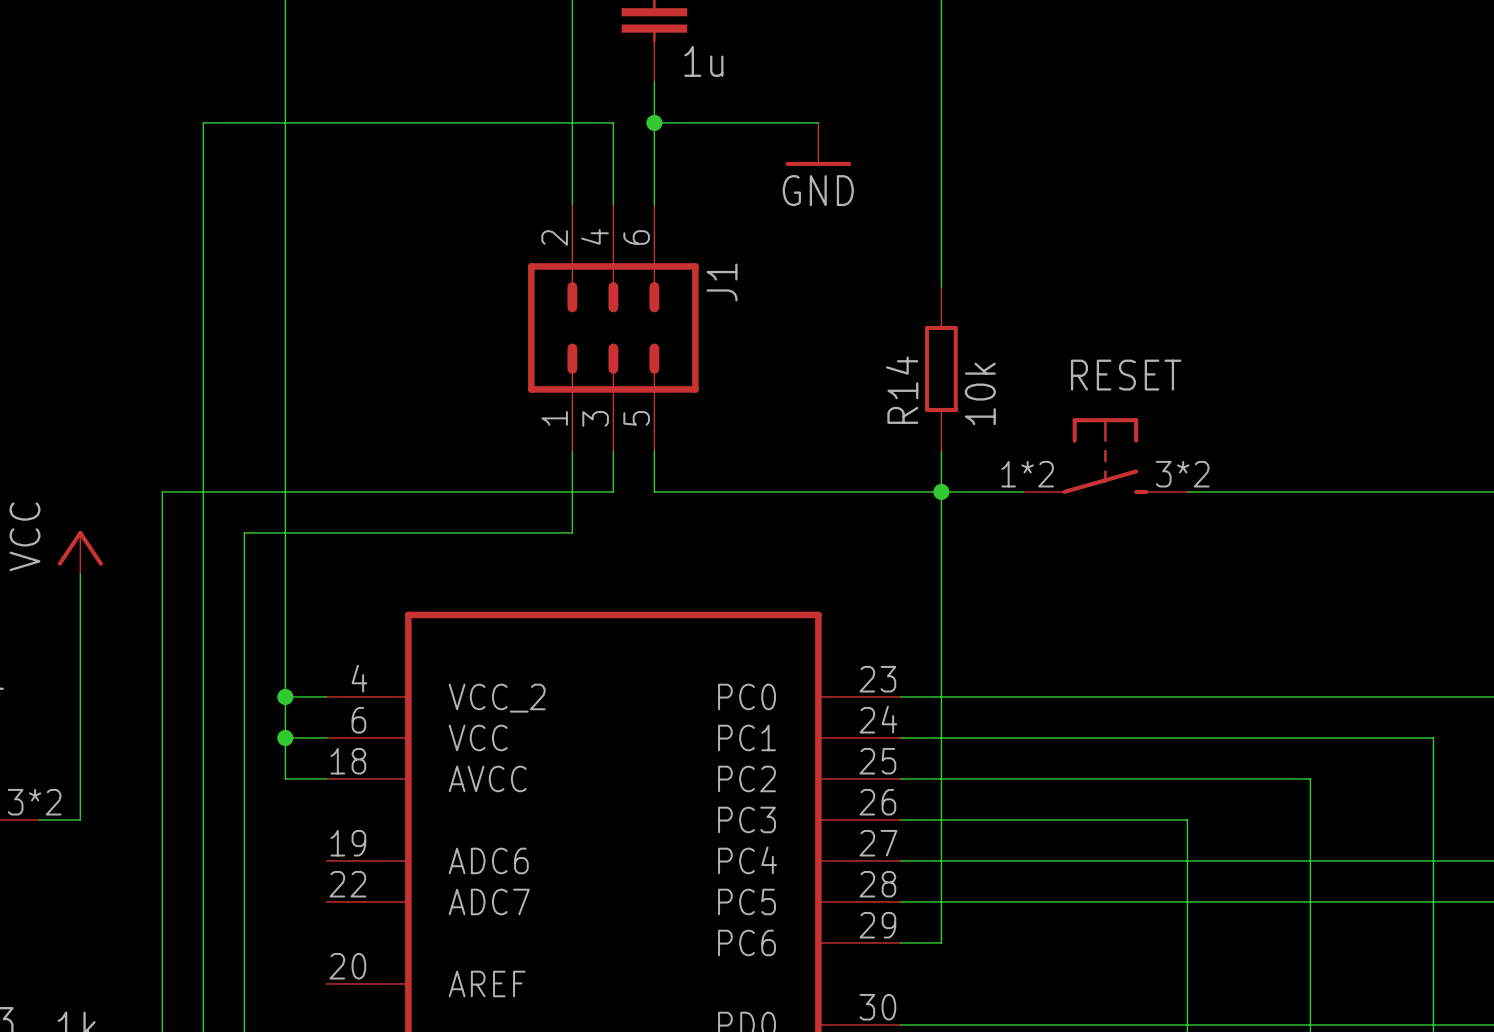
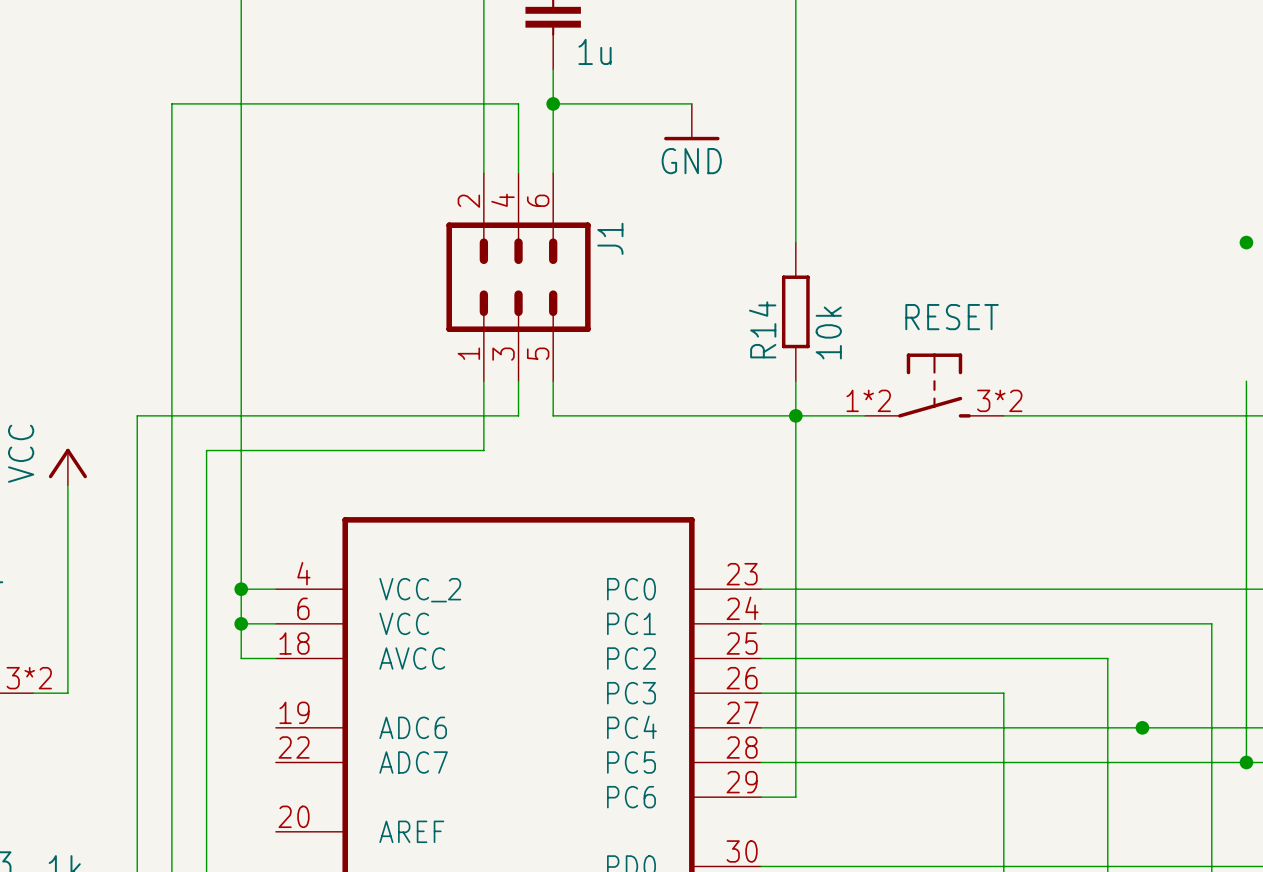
junction: none -> (1246, 242)
wire: none -> (1246, 381) (1246, 762)
junction: none -> (1142, 727)
junction: none -> (1246, 762)

